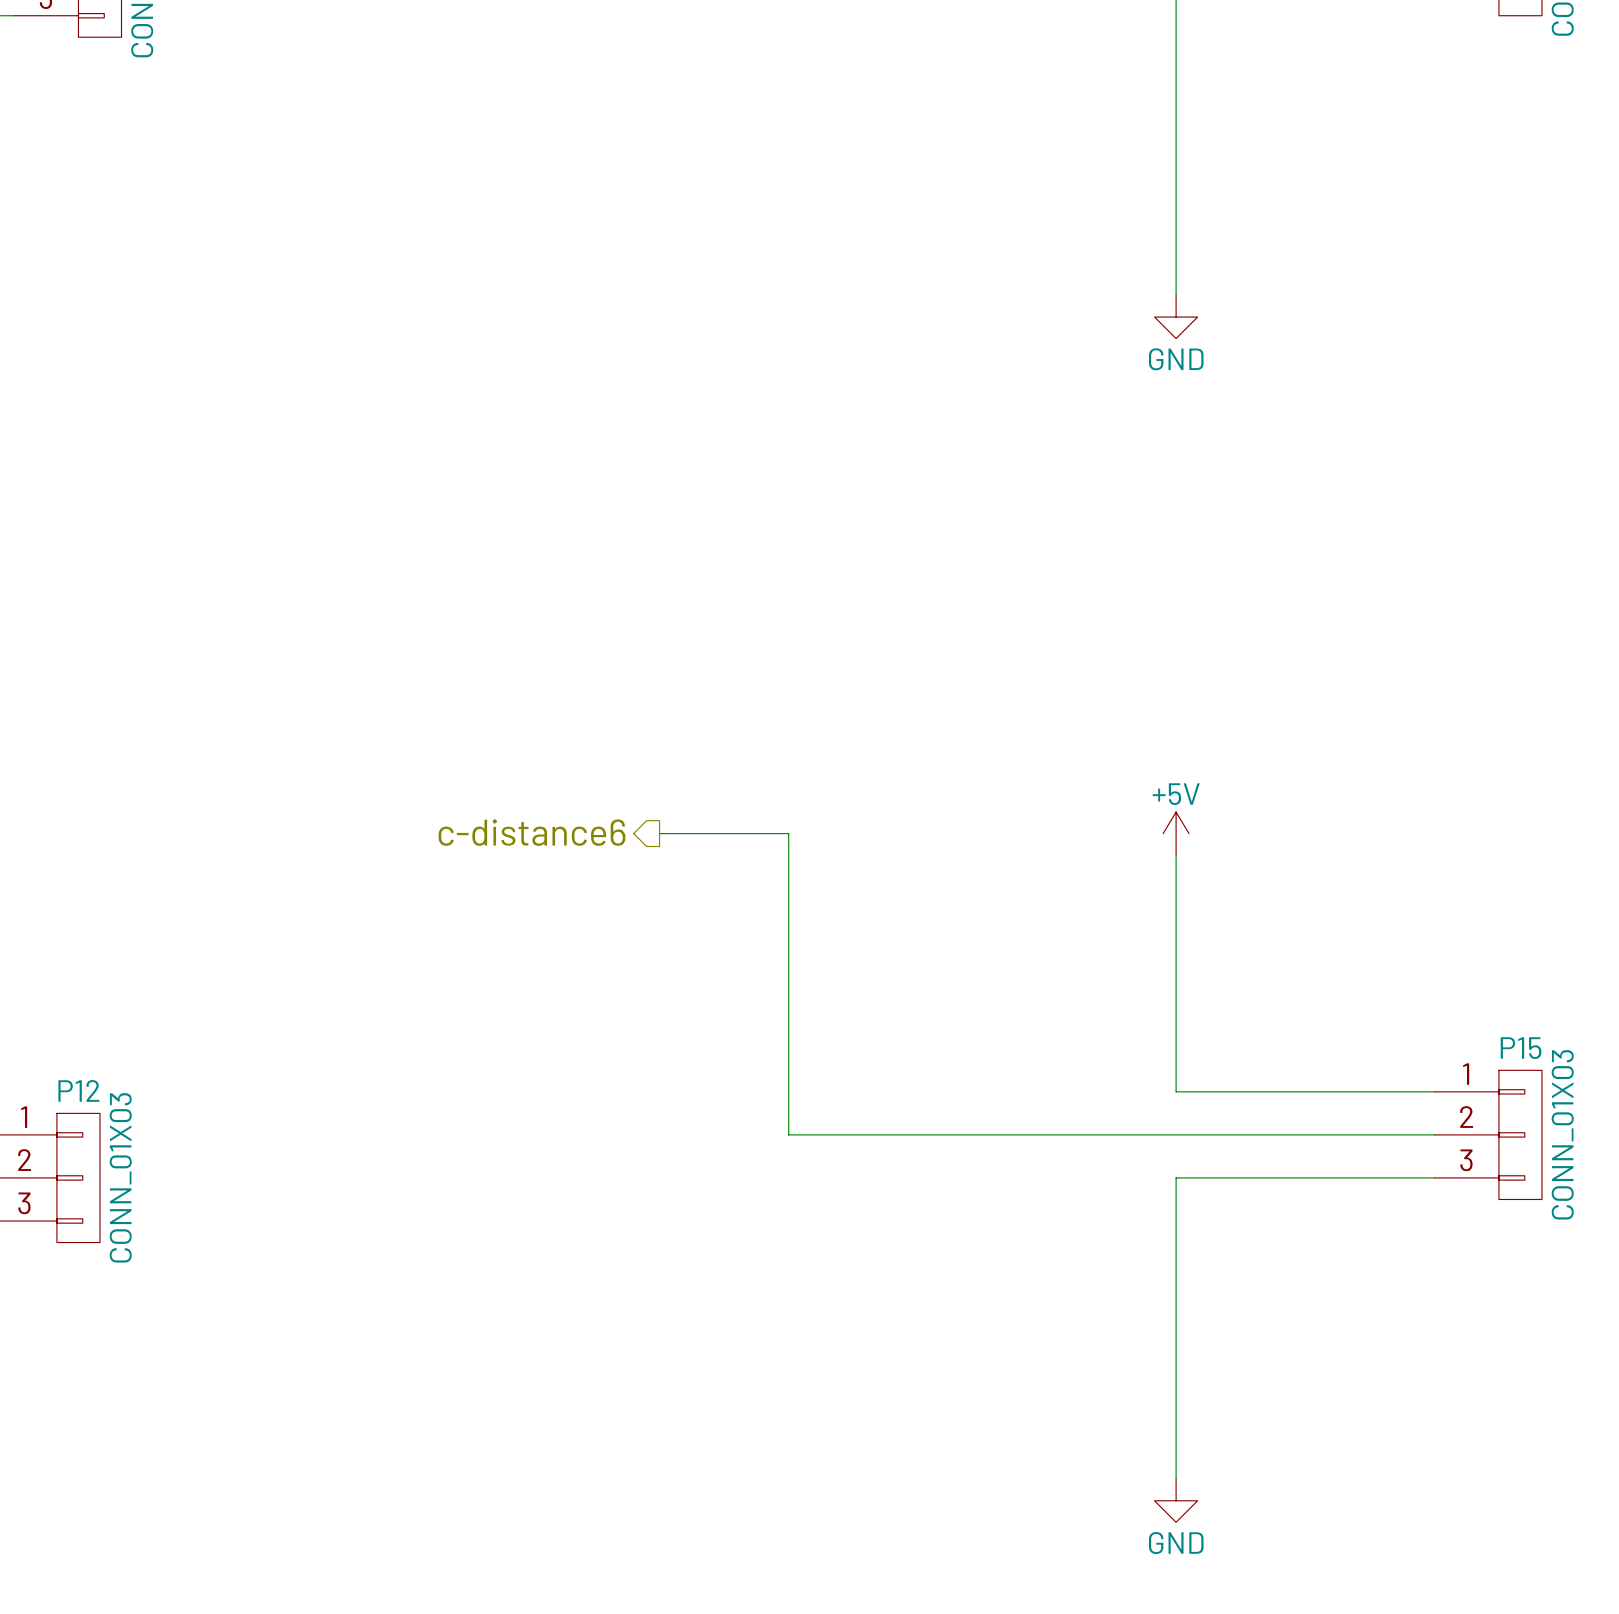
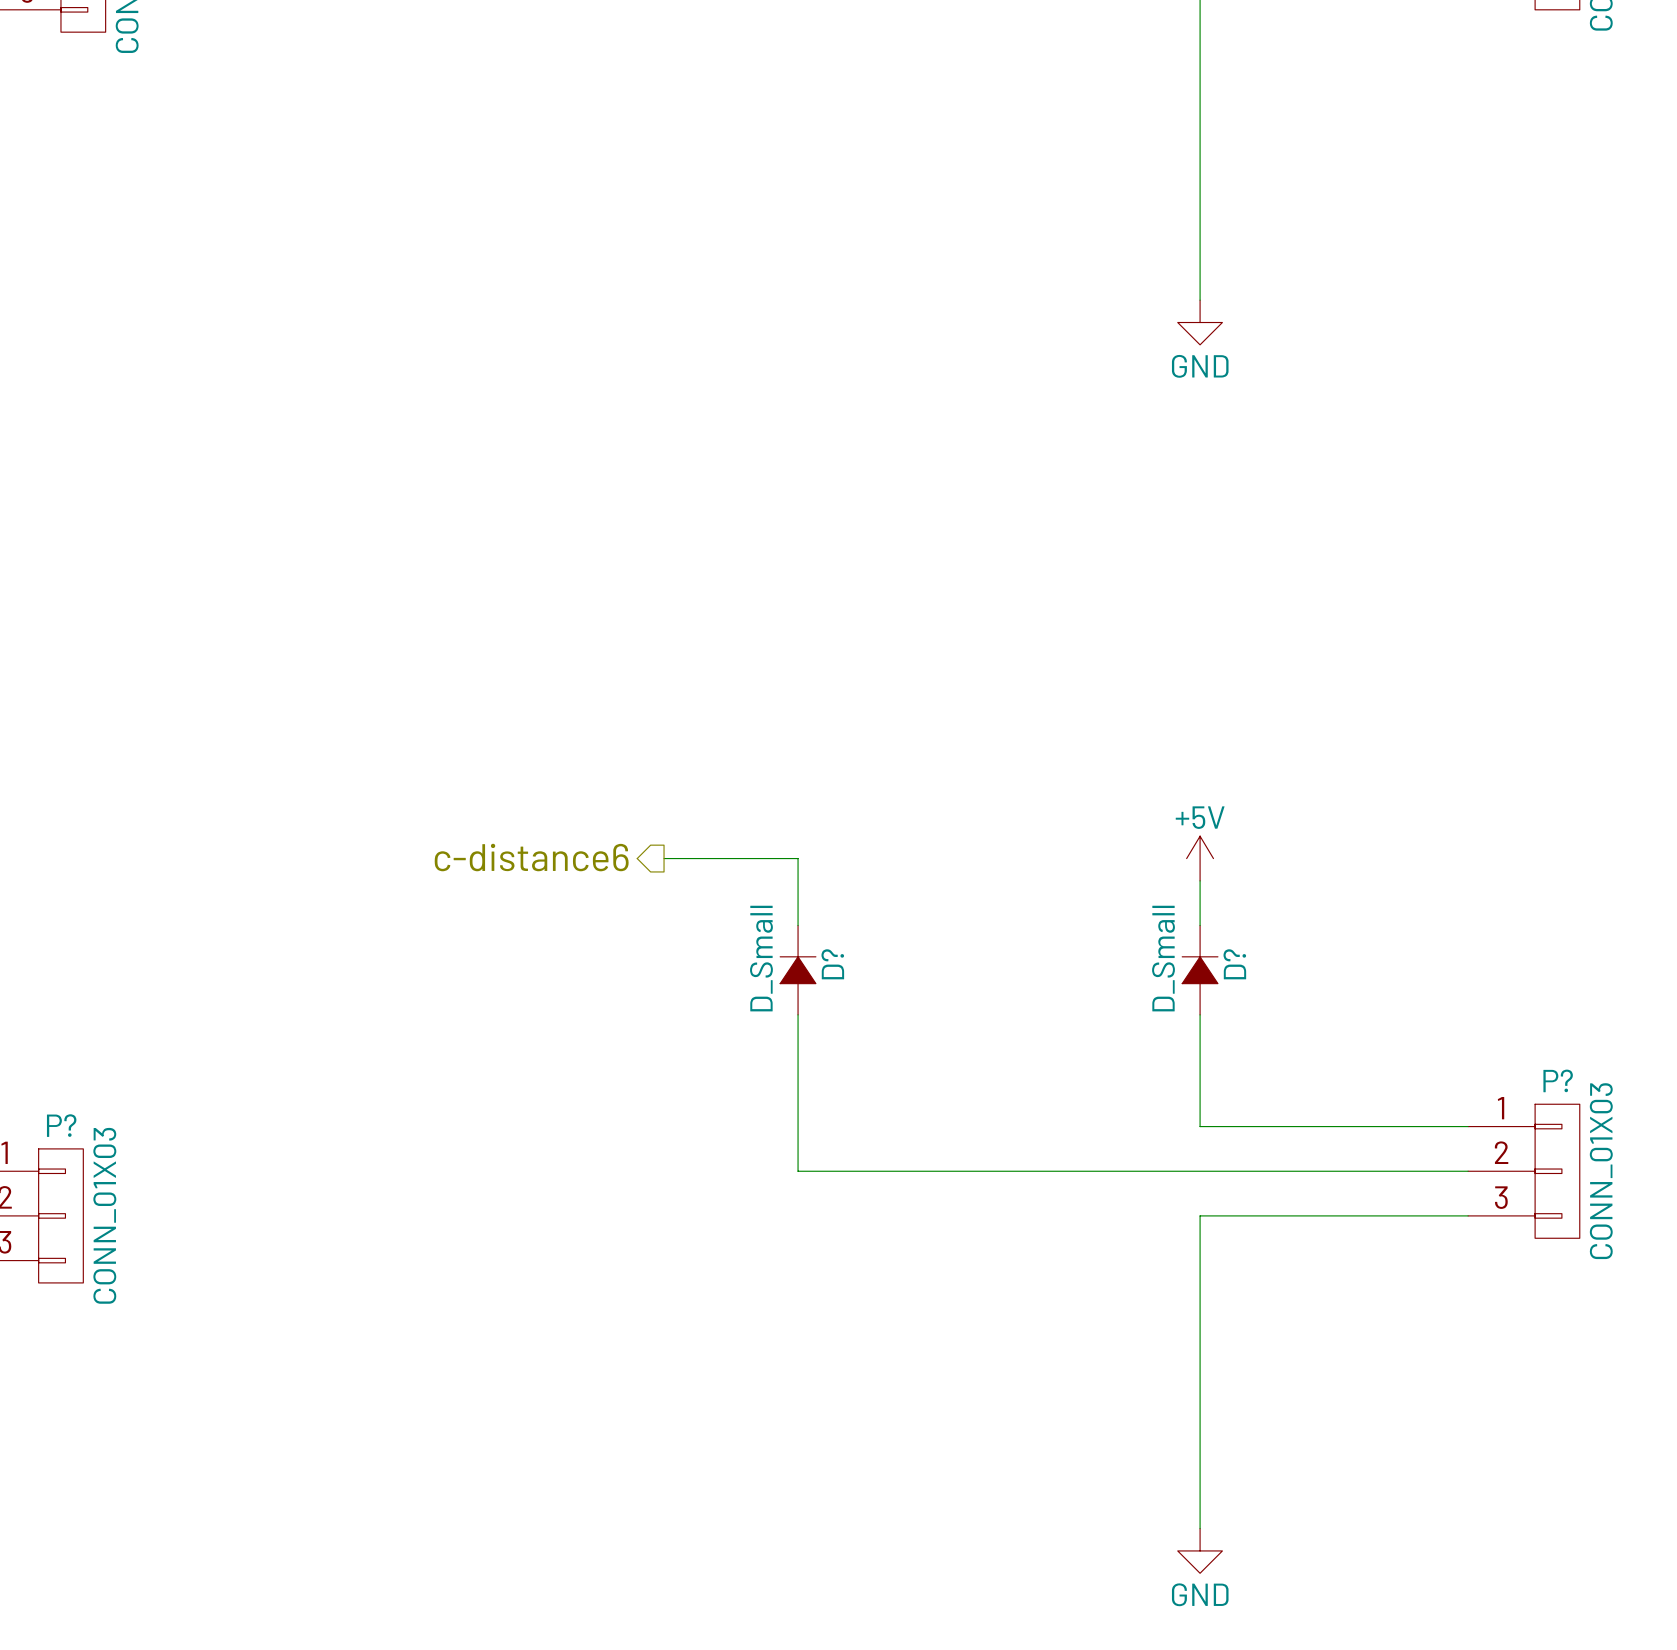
D?: none -> D_Small (798, 970)
D?: none -> D_Small (1200, 970)
P15 name: P15 (1521, 1048) -> P? (1558, 1080)
P12 name: P12 (78, 1090) -> P? (61, 1125)

